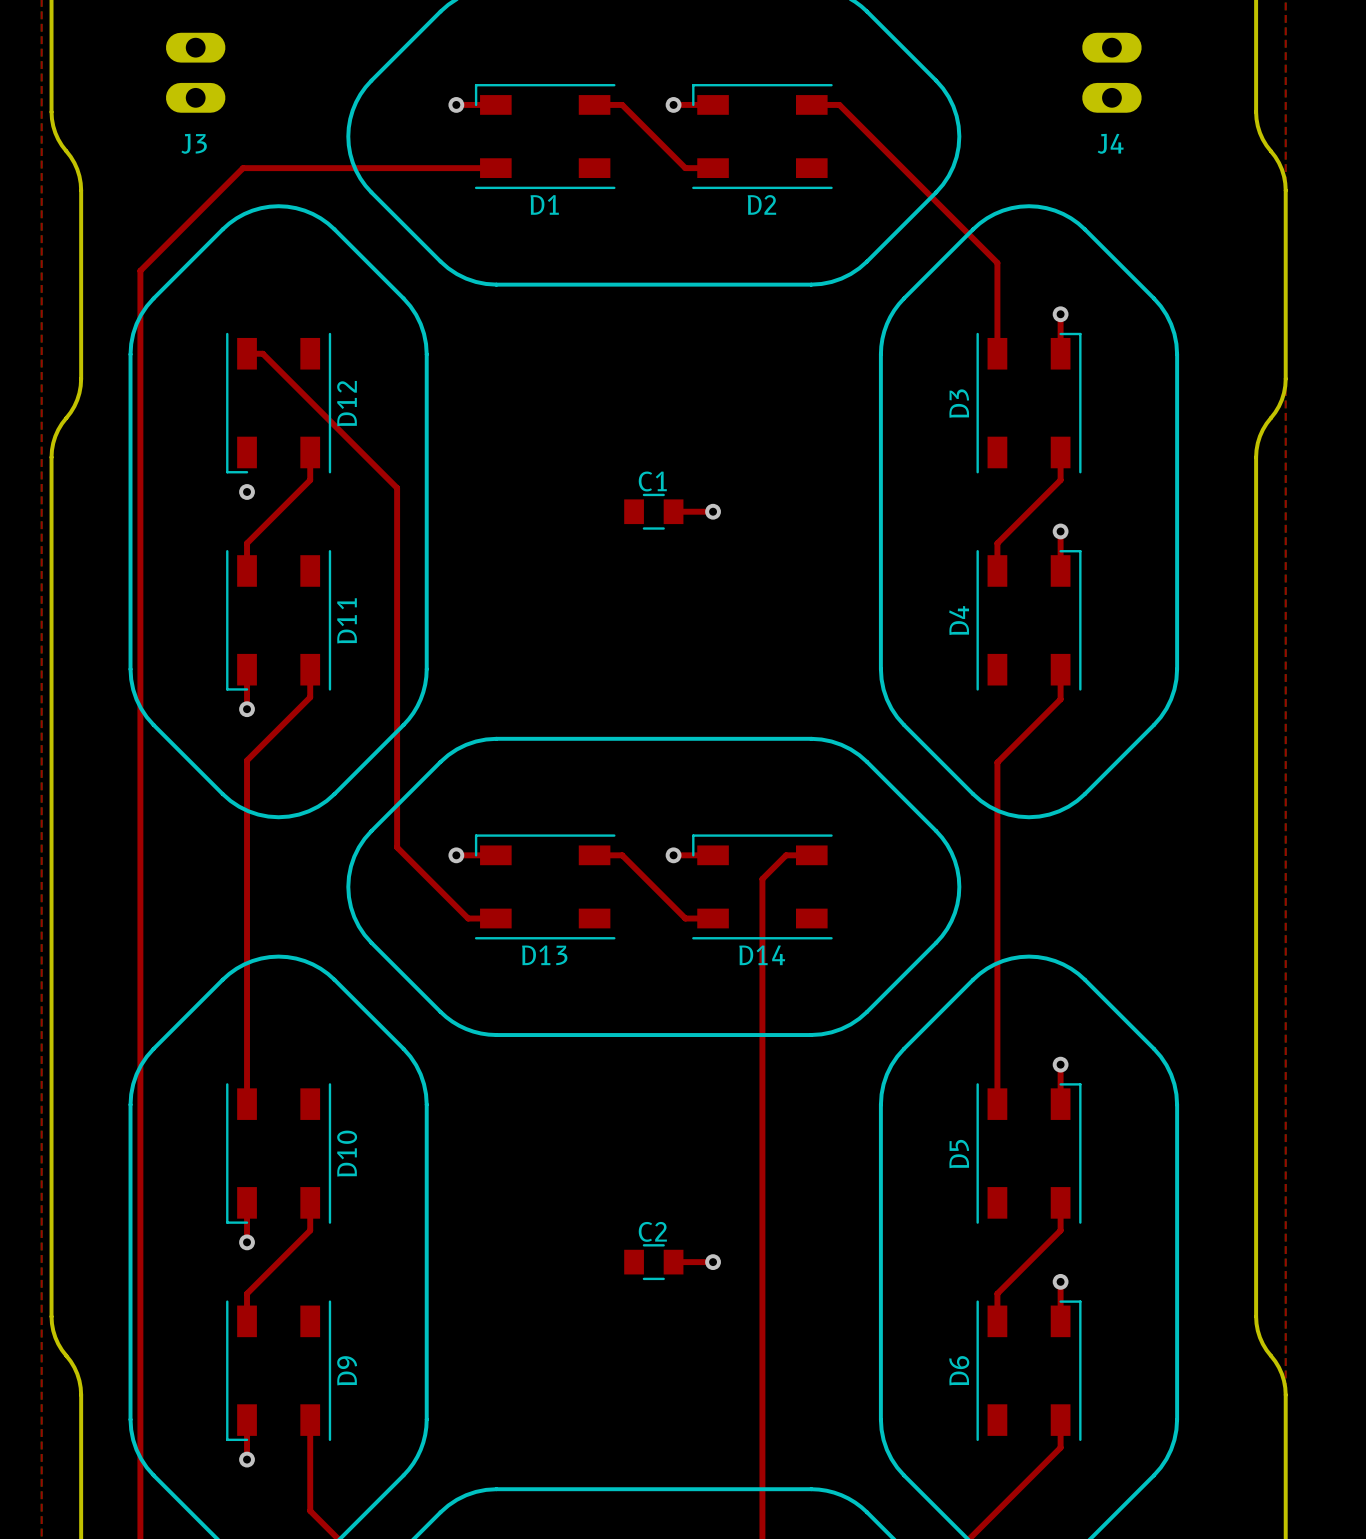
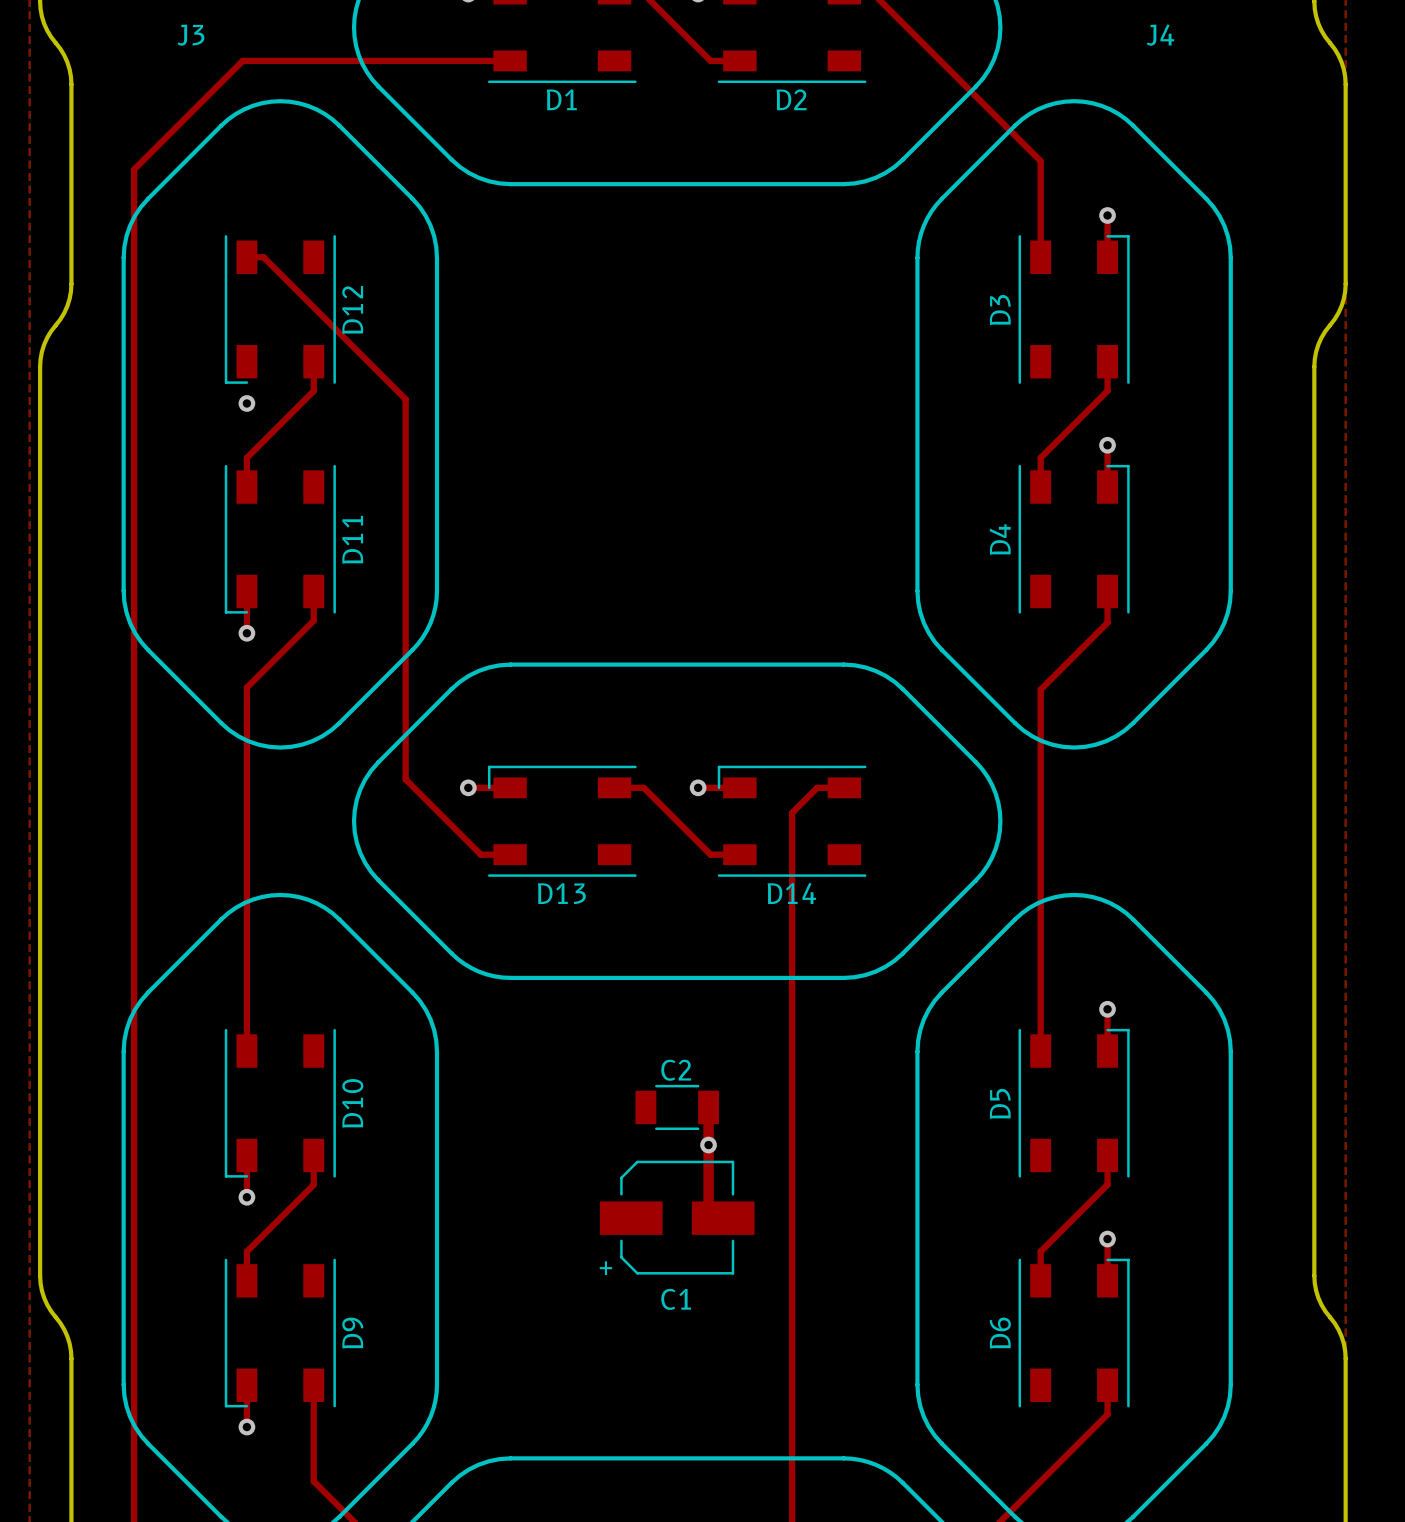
C1 name position: C1 (652, 481) -> C1 (676, 1299)
C1 footprint: [624, 493, 684, 530] -> [599, 1160, 755, 1275]
top track: (673, 511) (713, 511) -> none
via: (713, 511) -> none
top track: none -> (708, 1107) (708, 1203) (723, 1218)
C2 footprint: [624, 1244, 684, 1281] -> [635, 1084, 720, 1131]
top track: (673, 1262) (713, 1262) -> none
via position: (713, 1262) -> (708, 1145)

